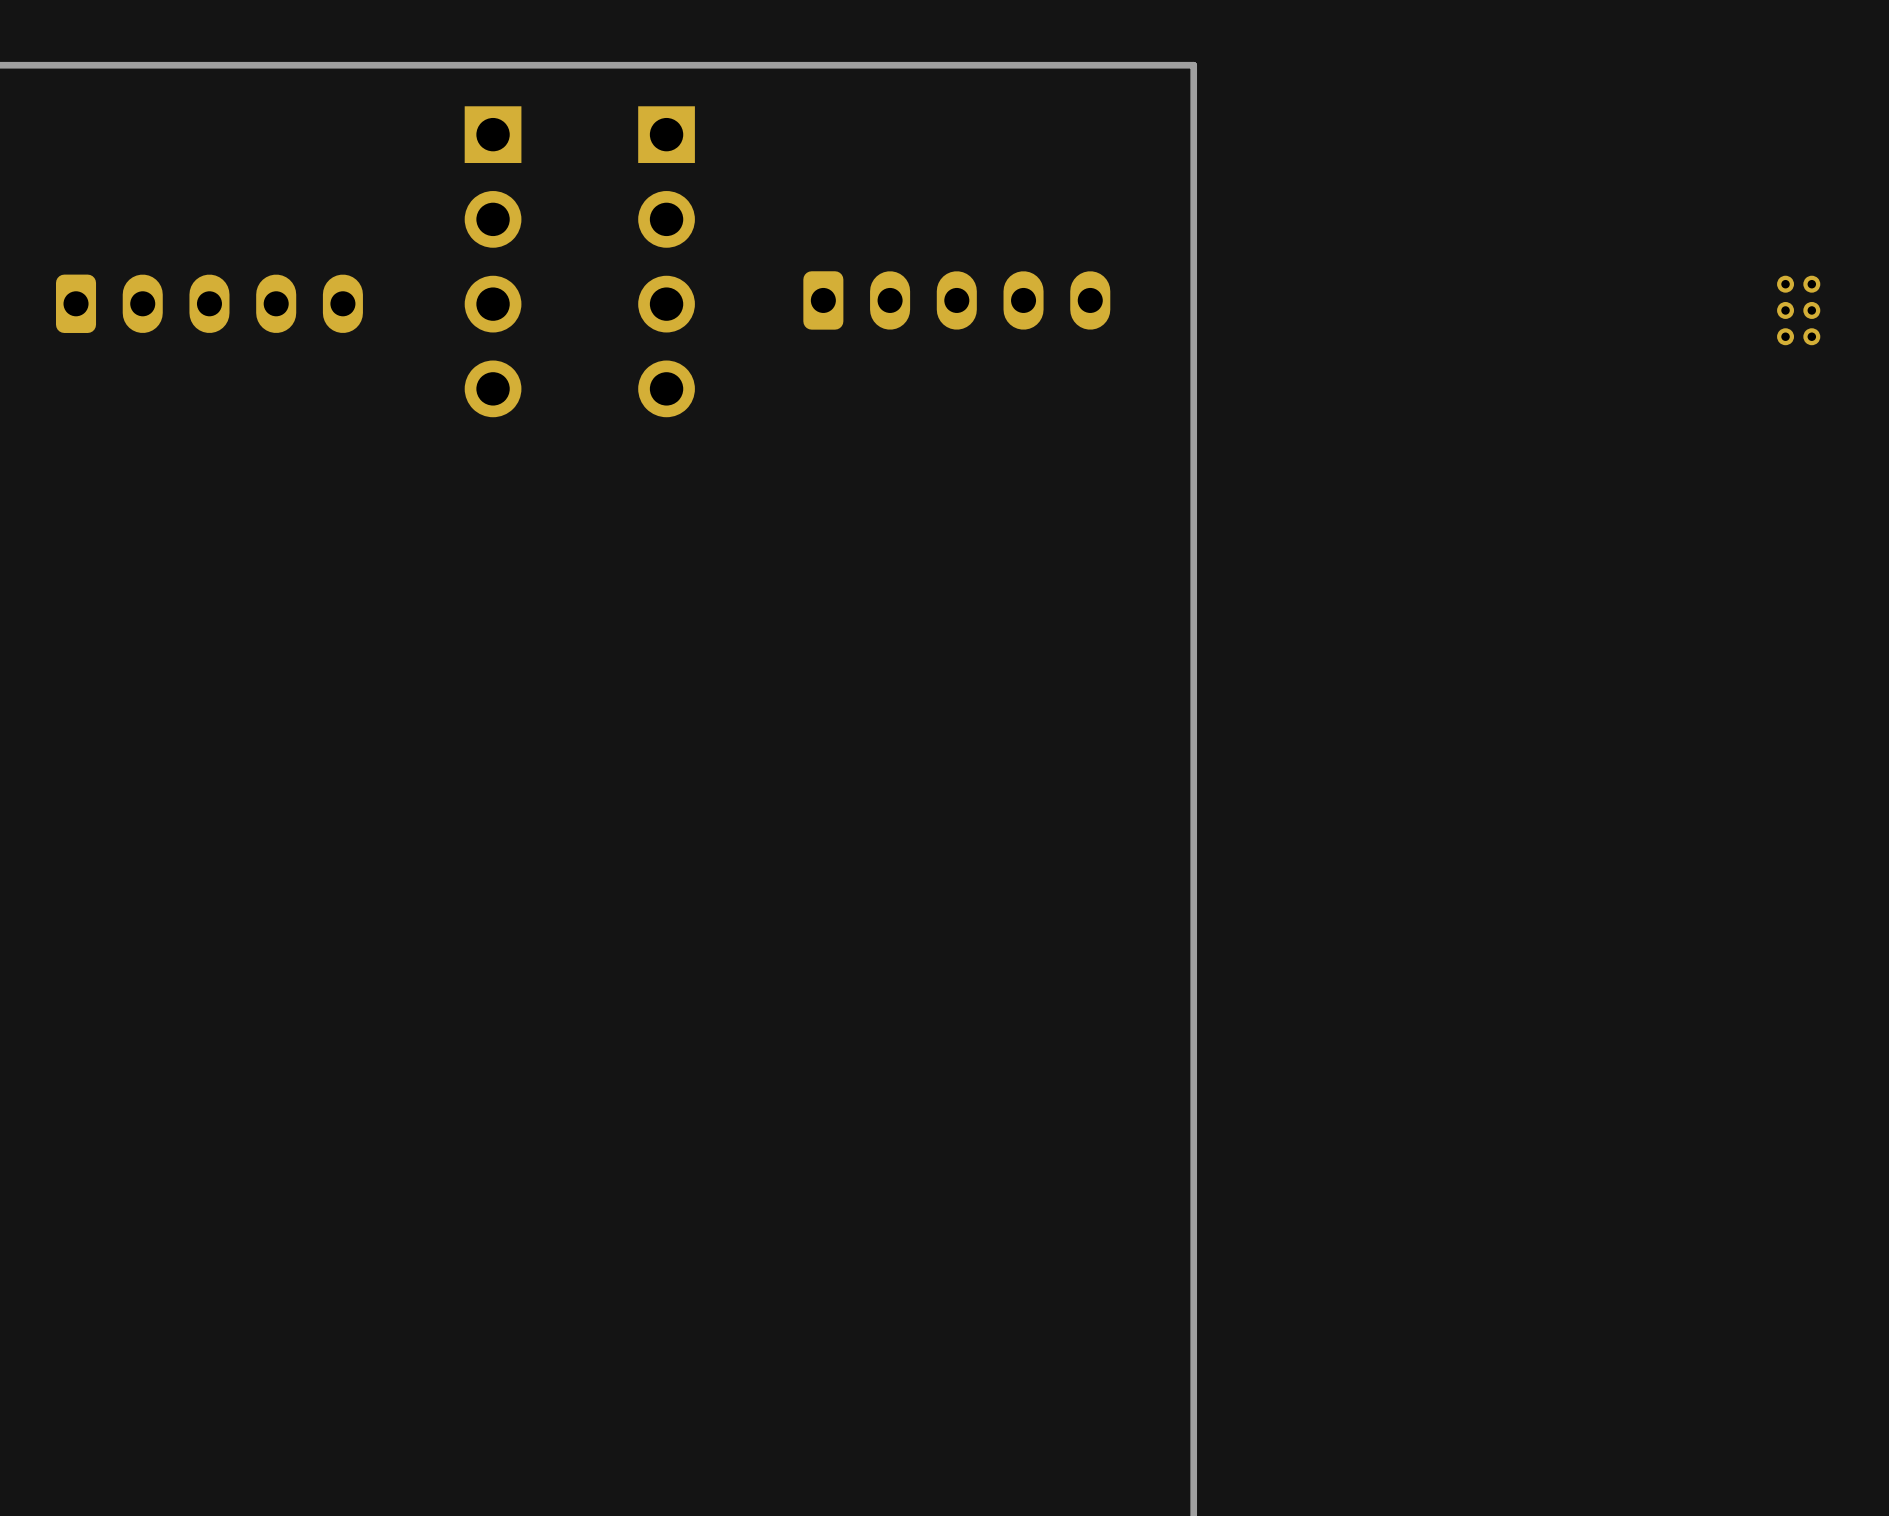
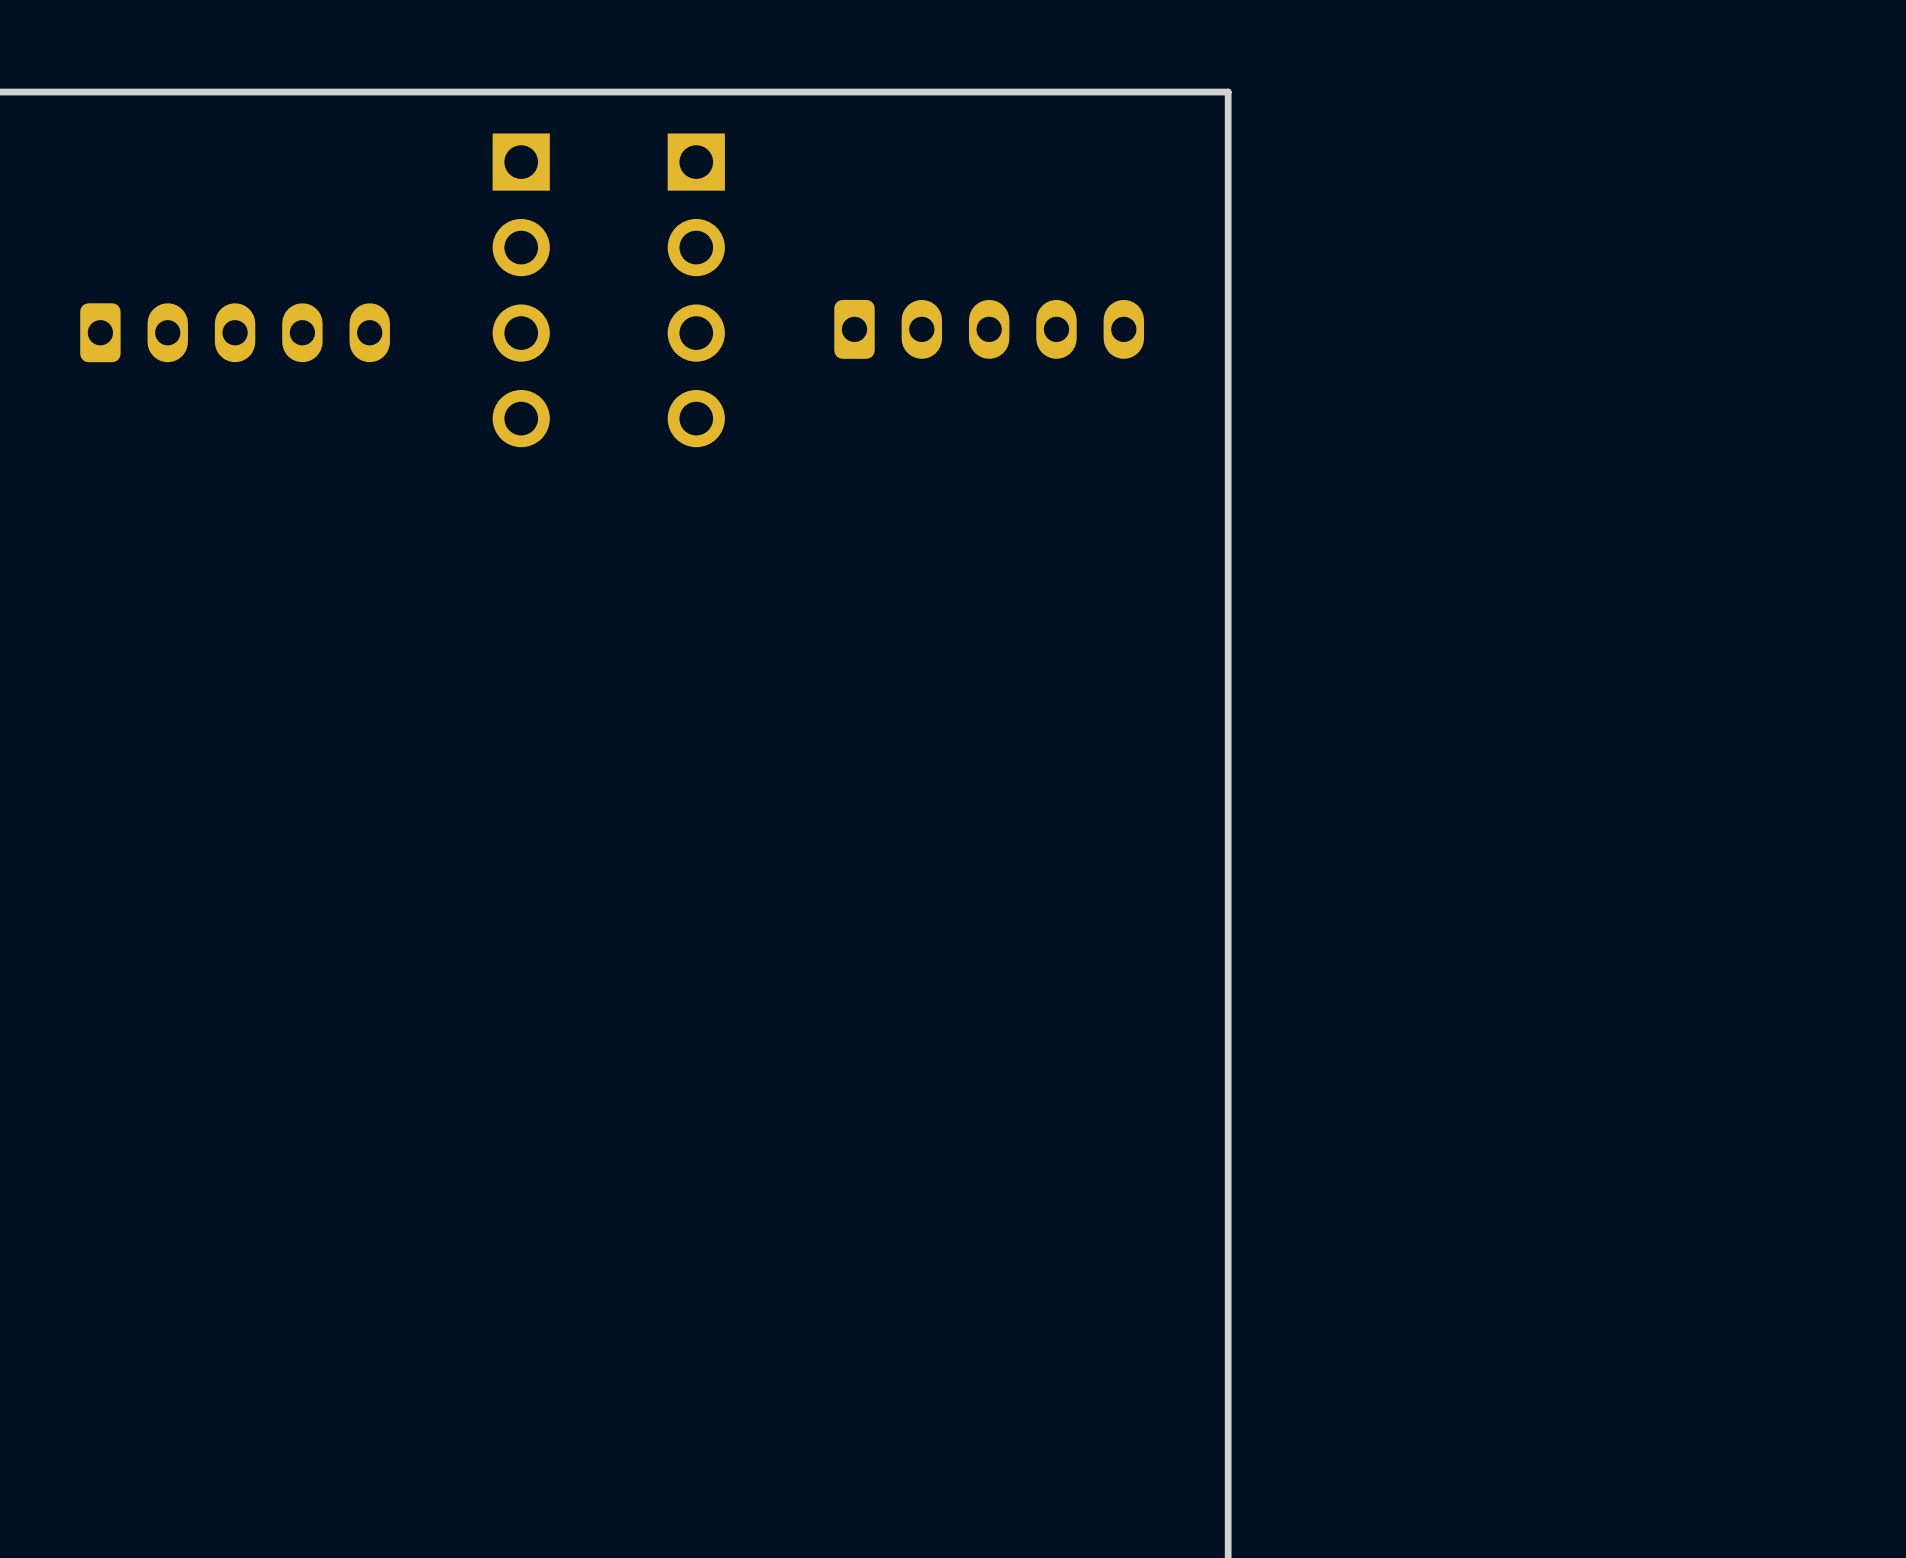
part: (1798, 310) -> none

